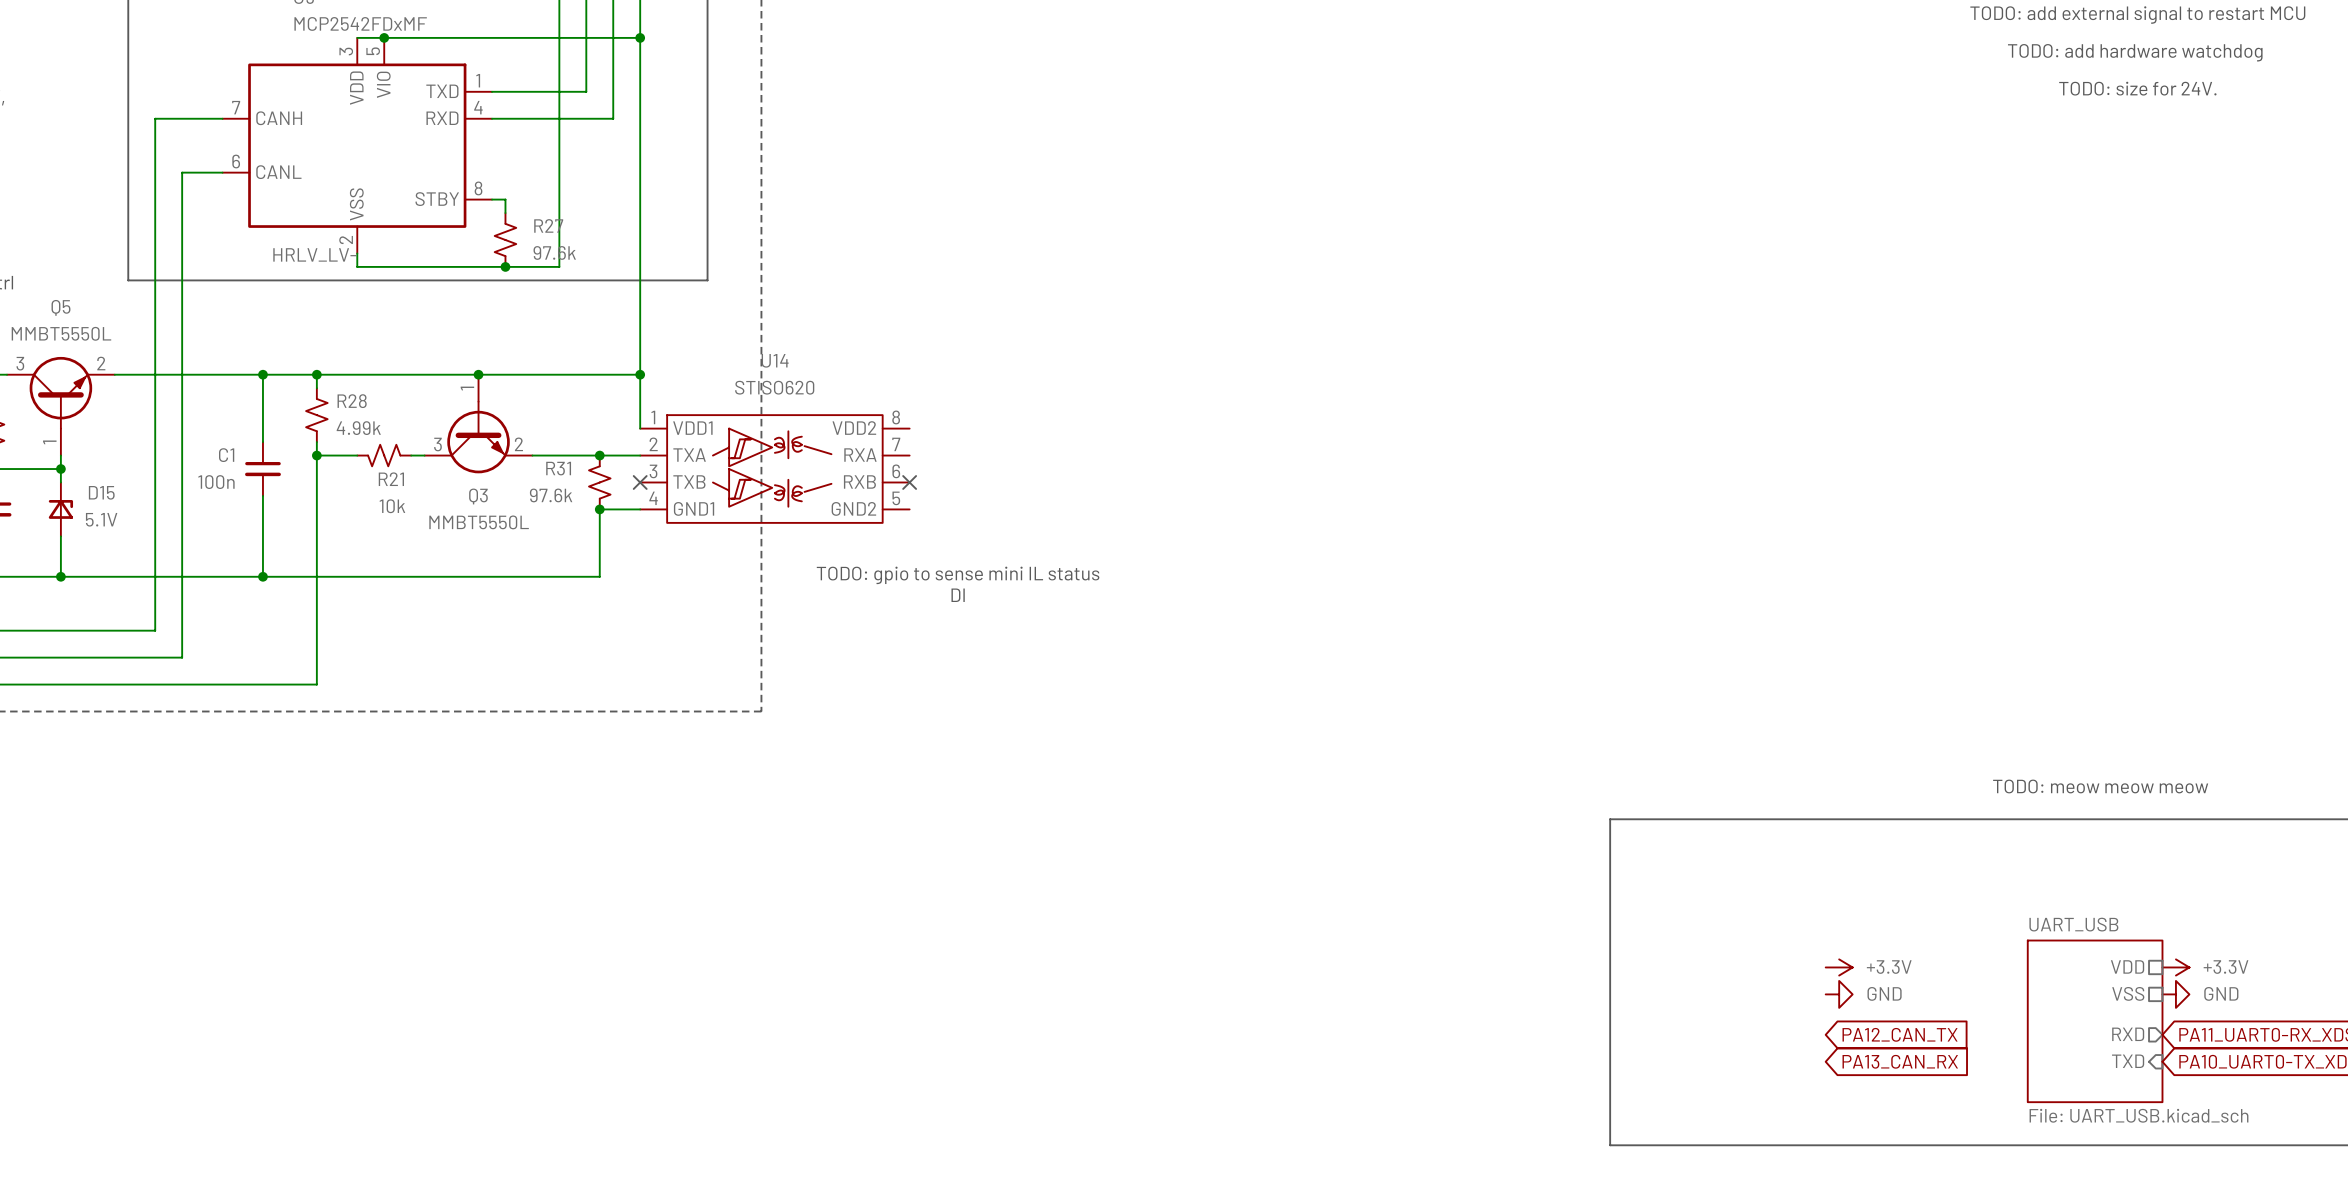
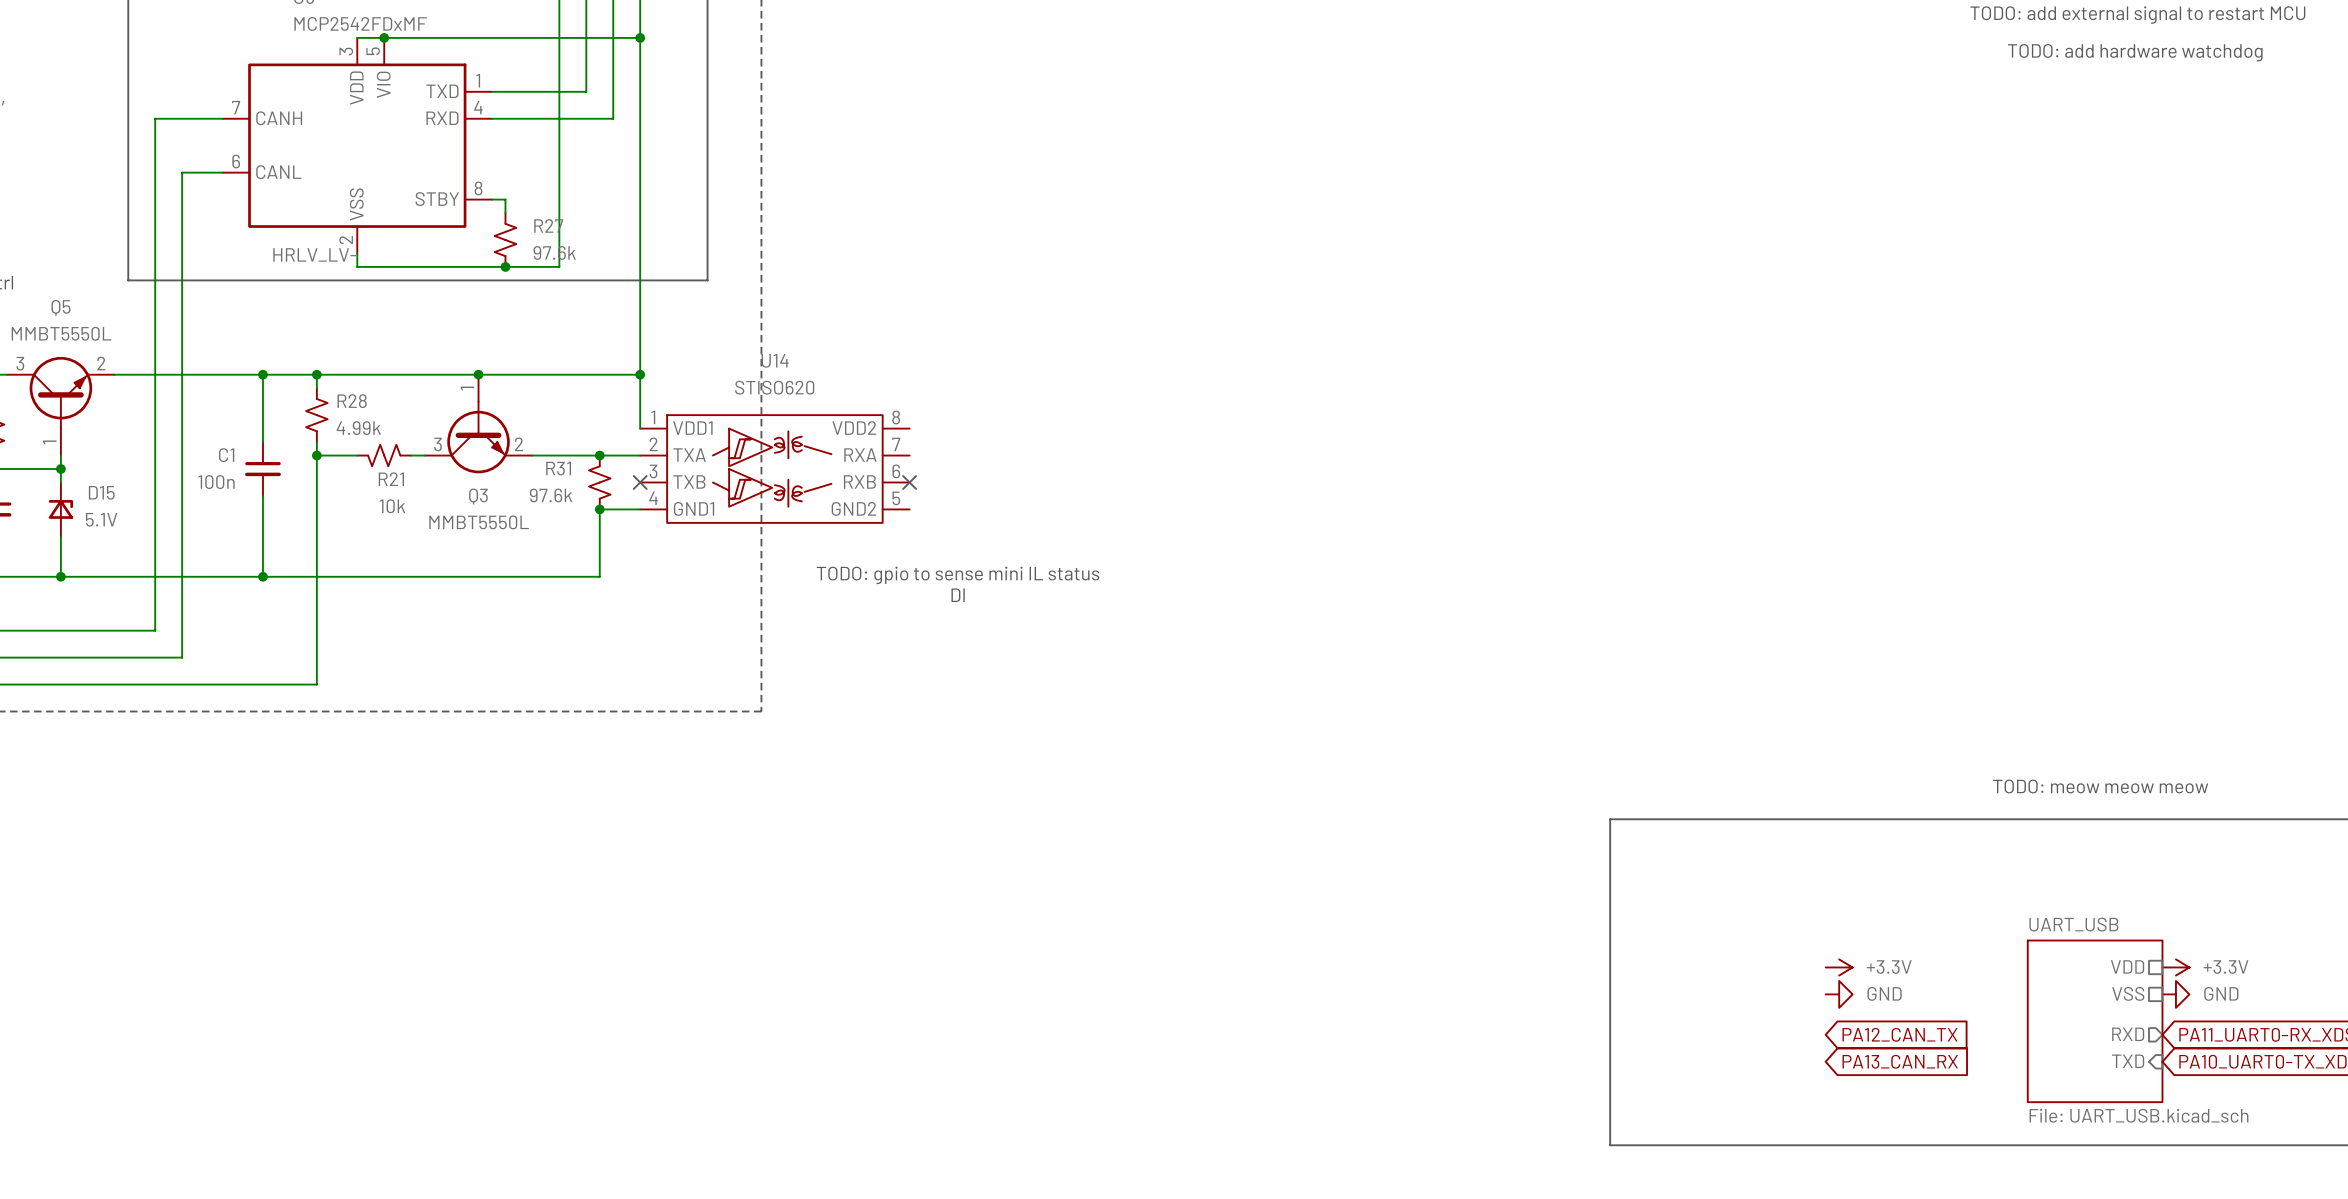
text: TODO: size for 24V. (2137, 88) -> none

